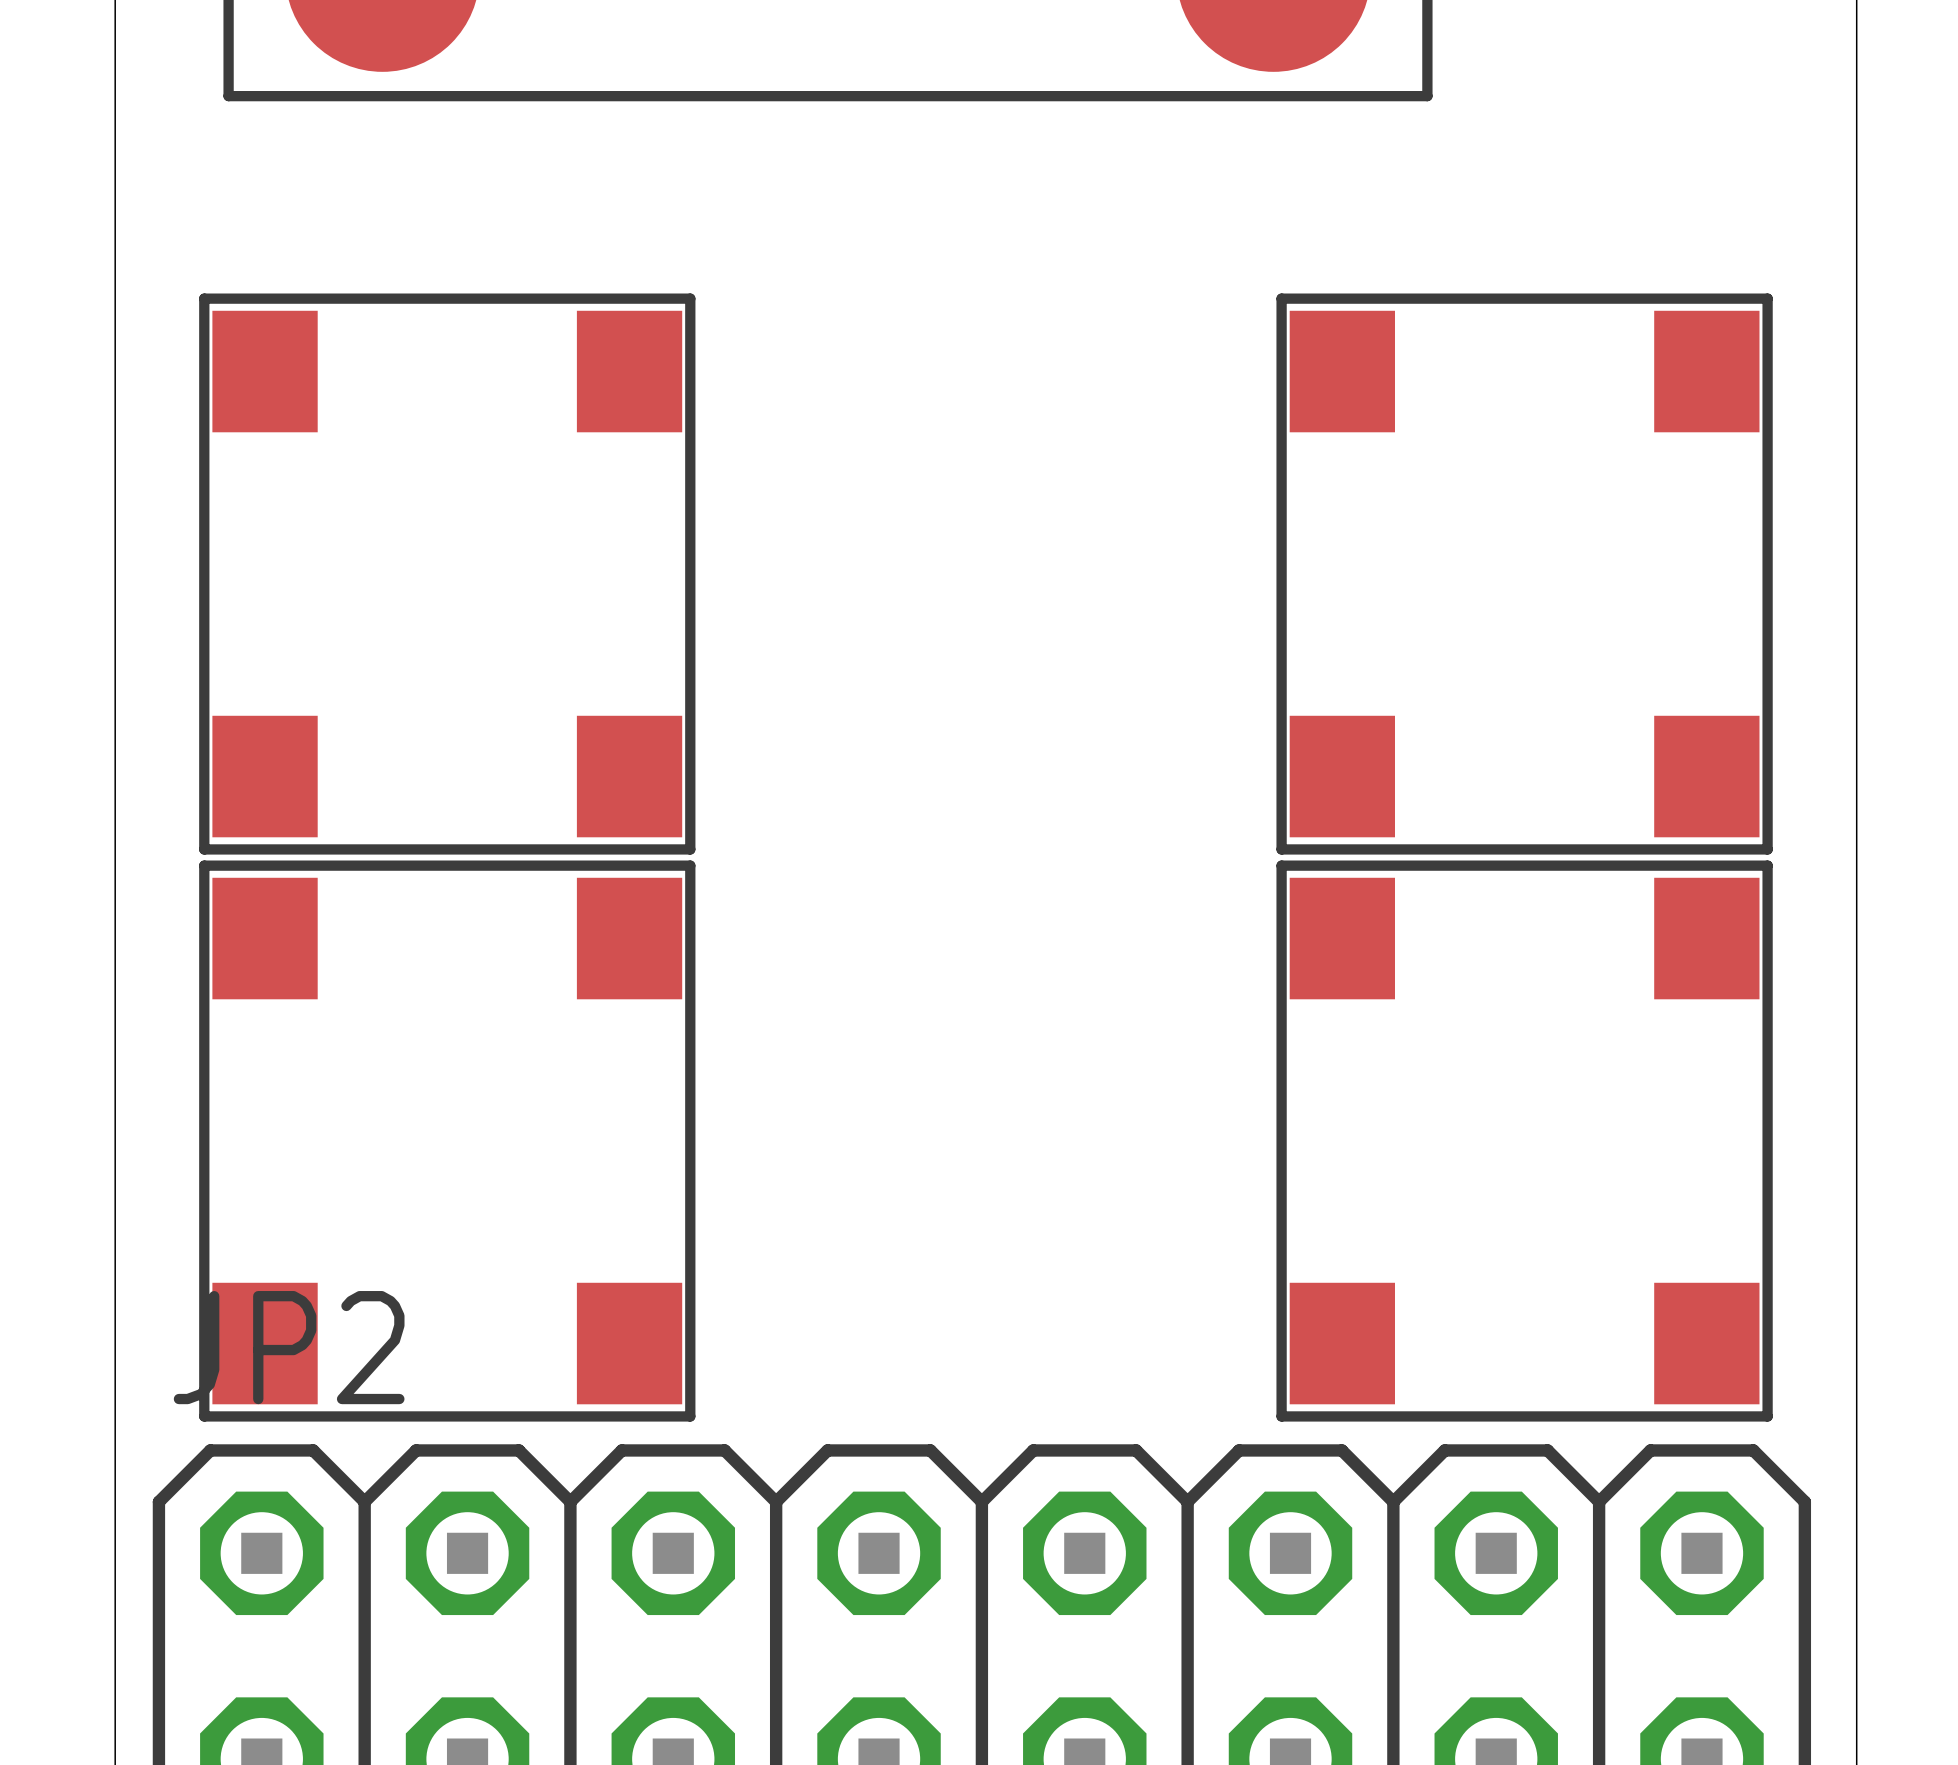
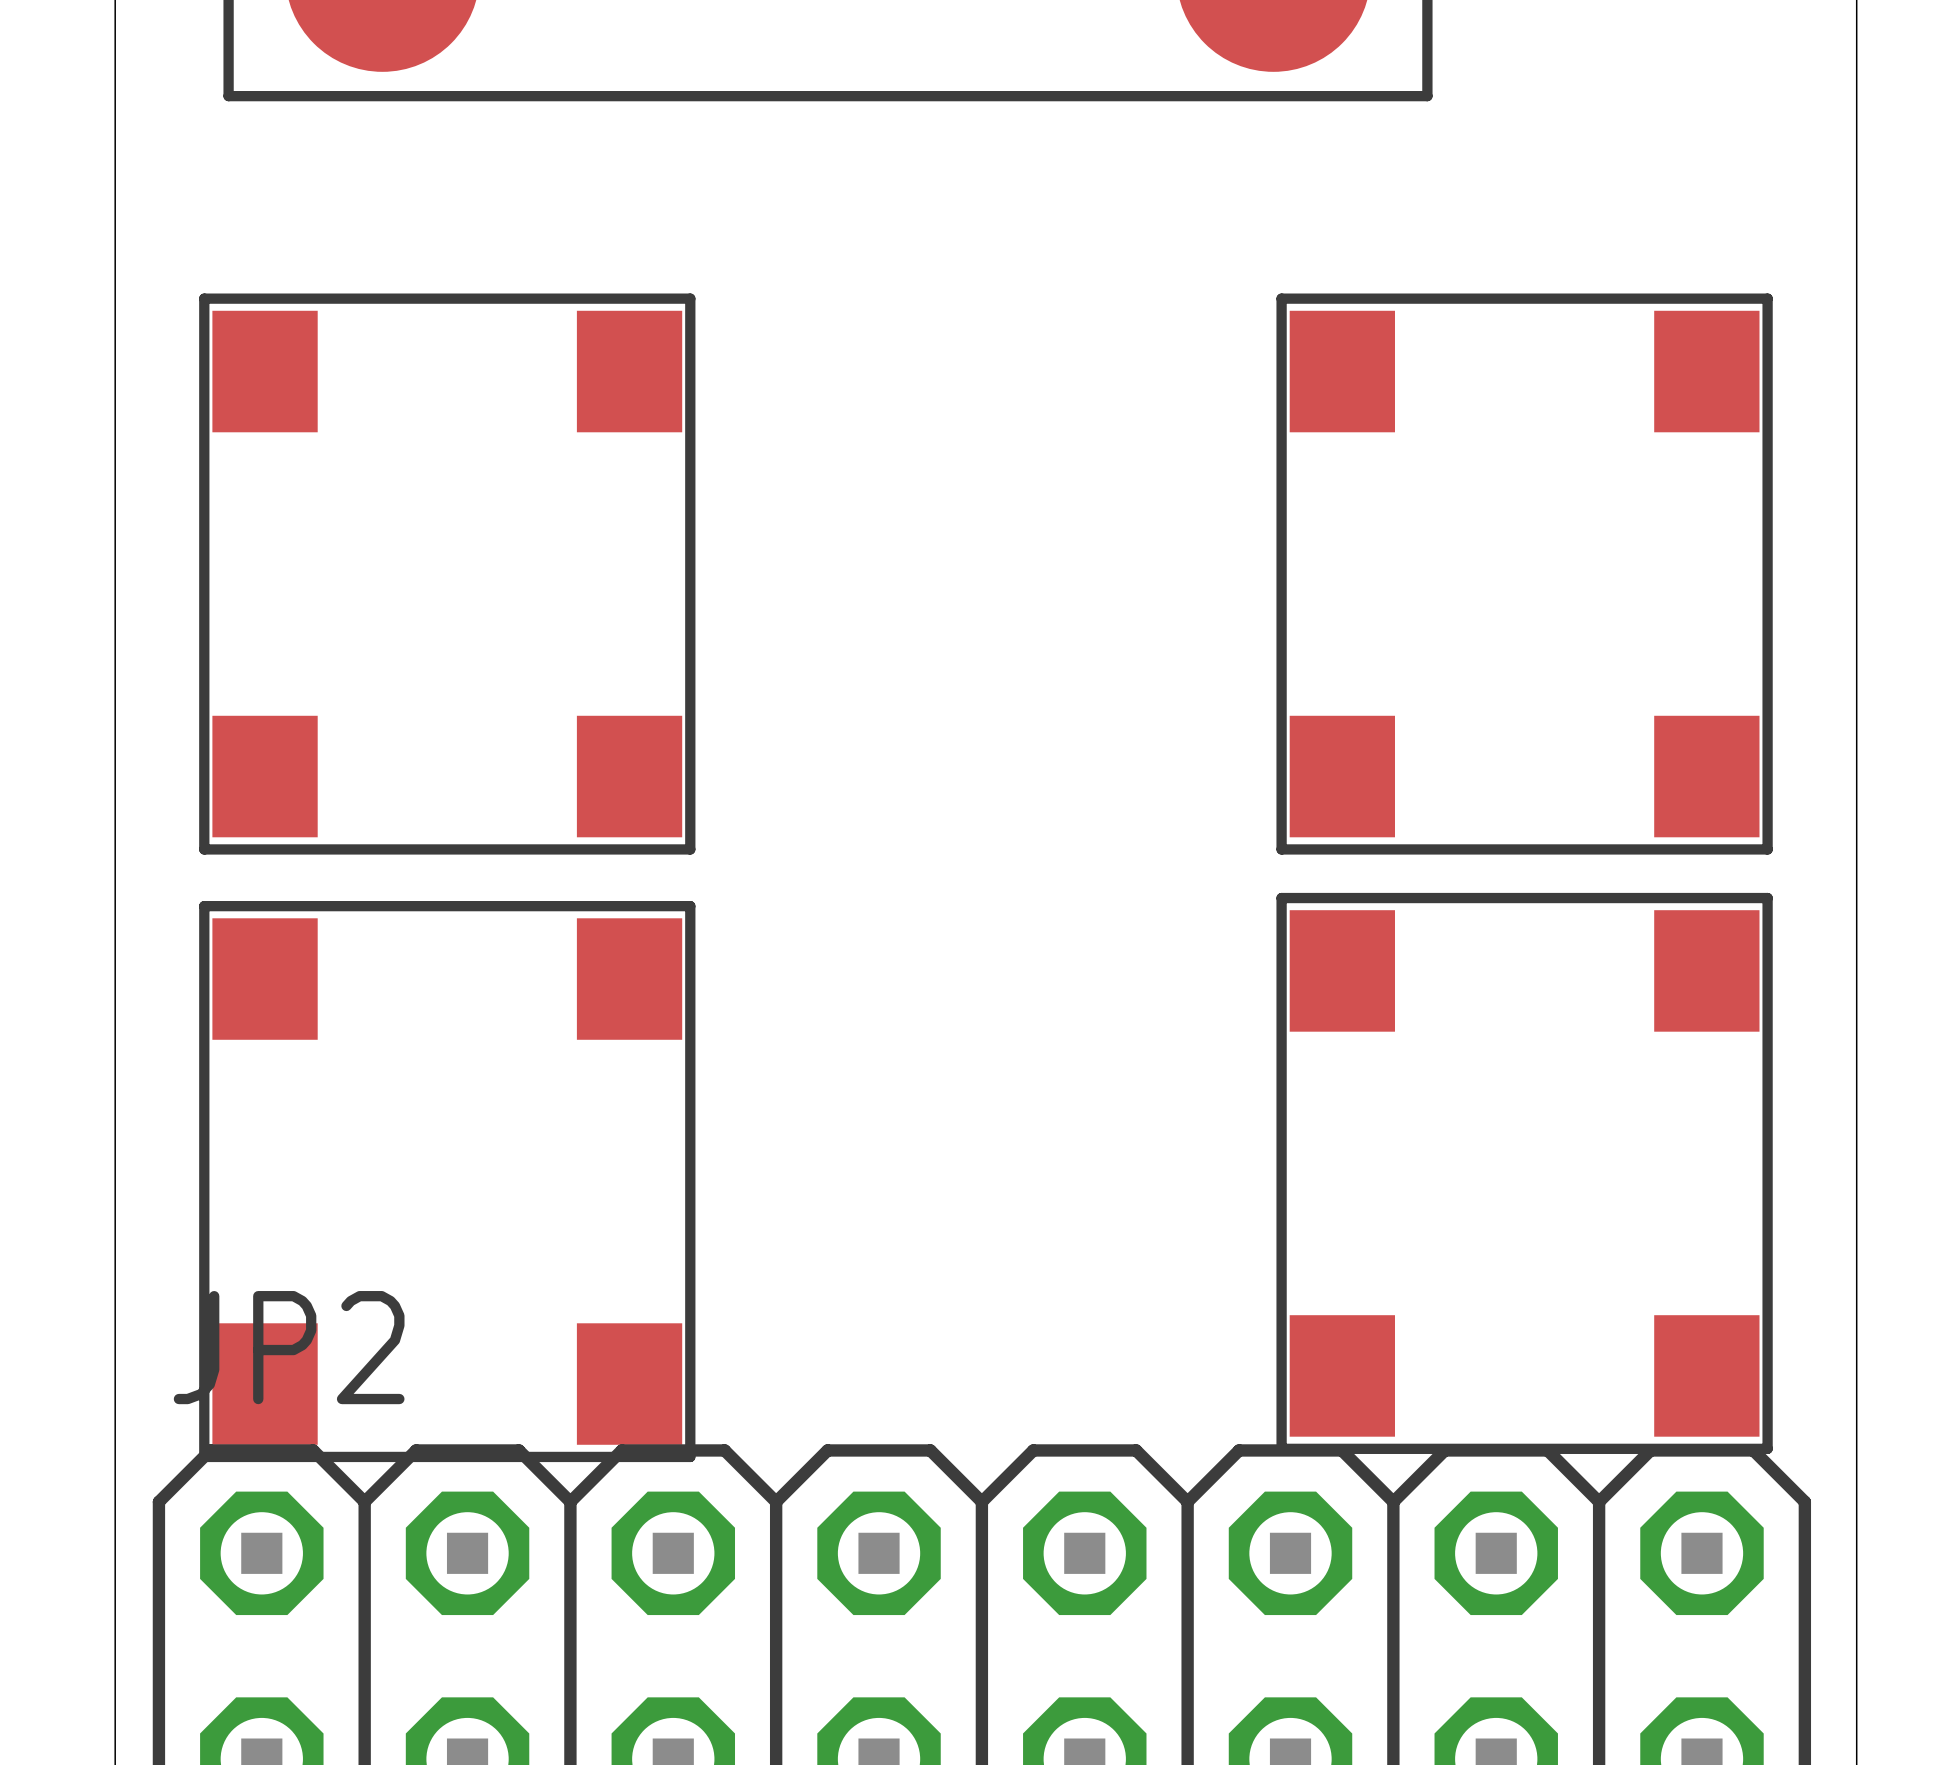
part position: (447, 1141) -> (447, 1181)
part position: (1524, 1141) -> (1524, 1173)

